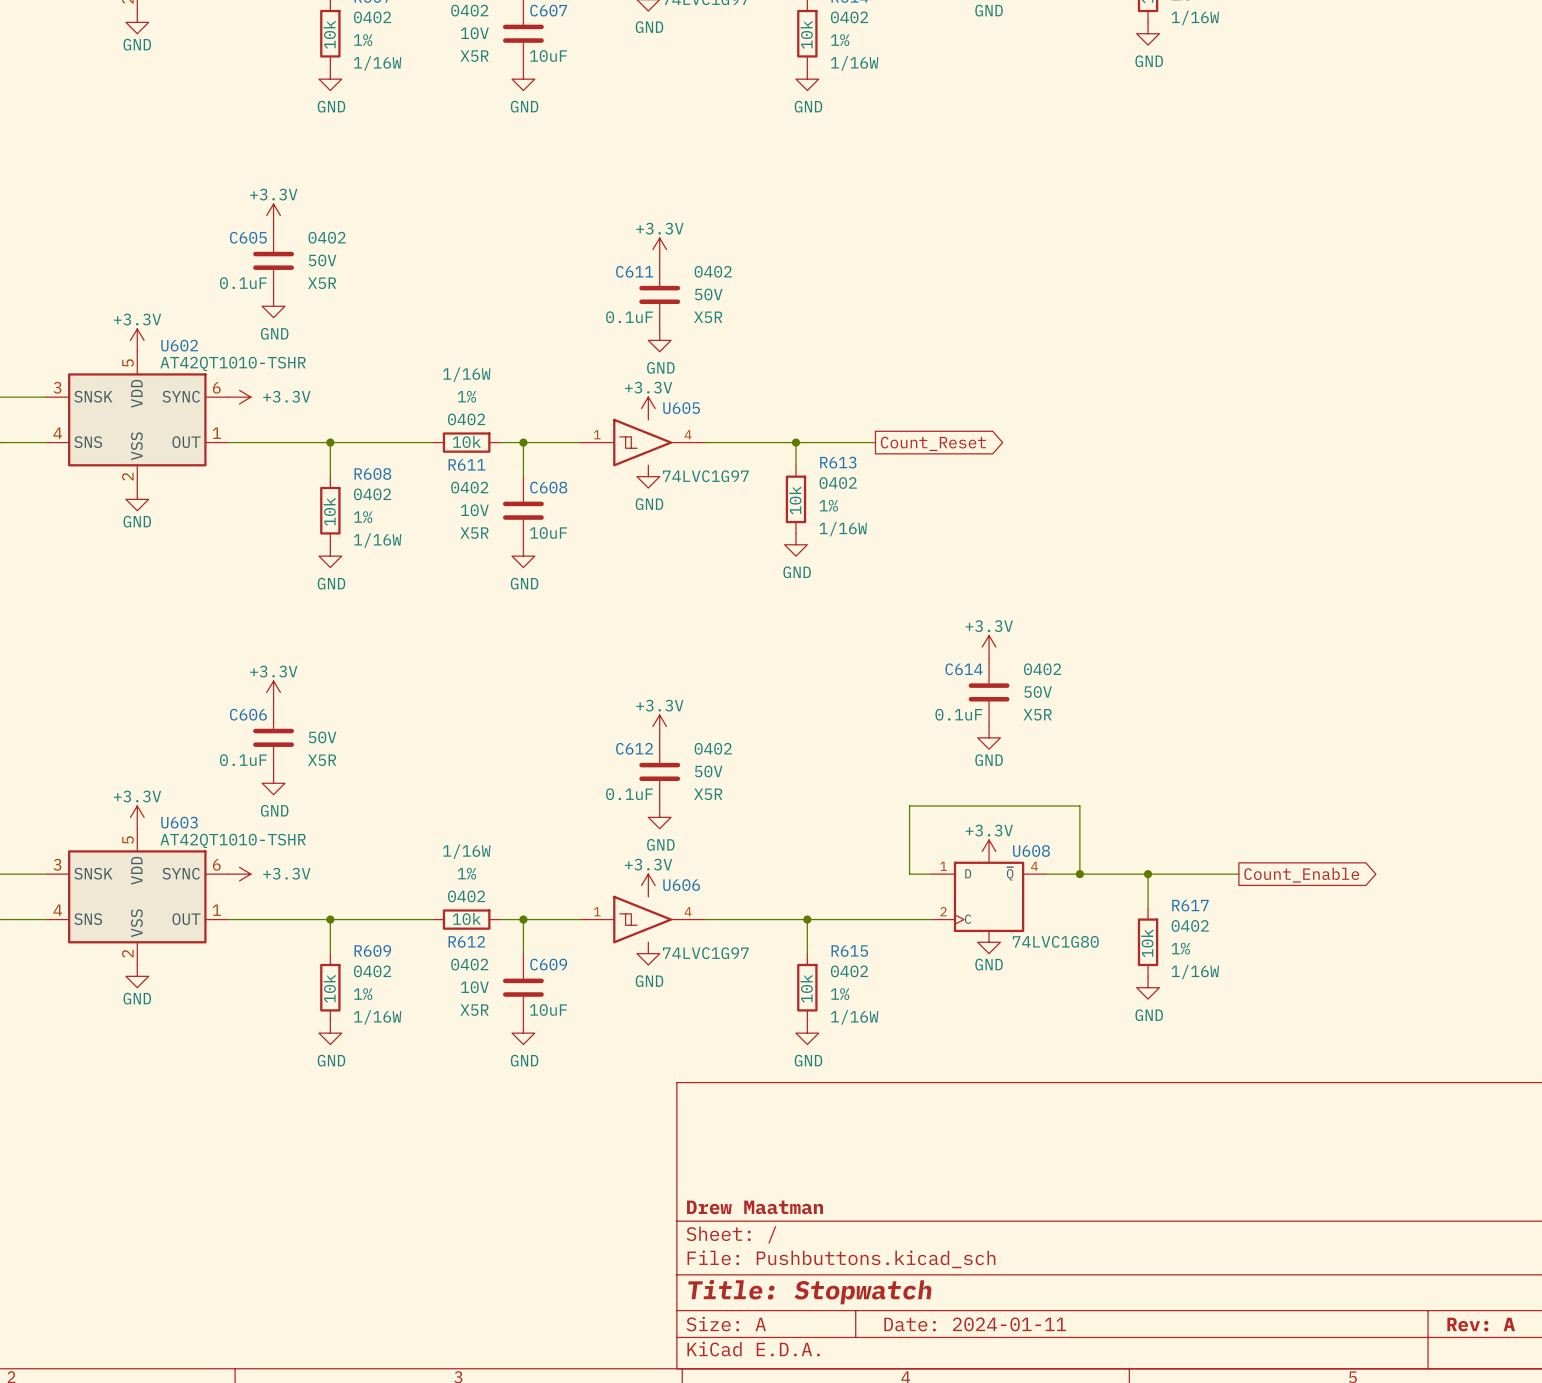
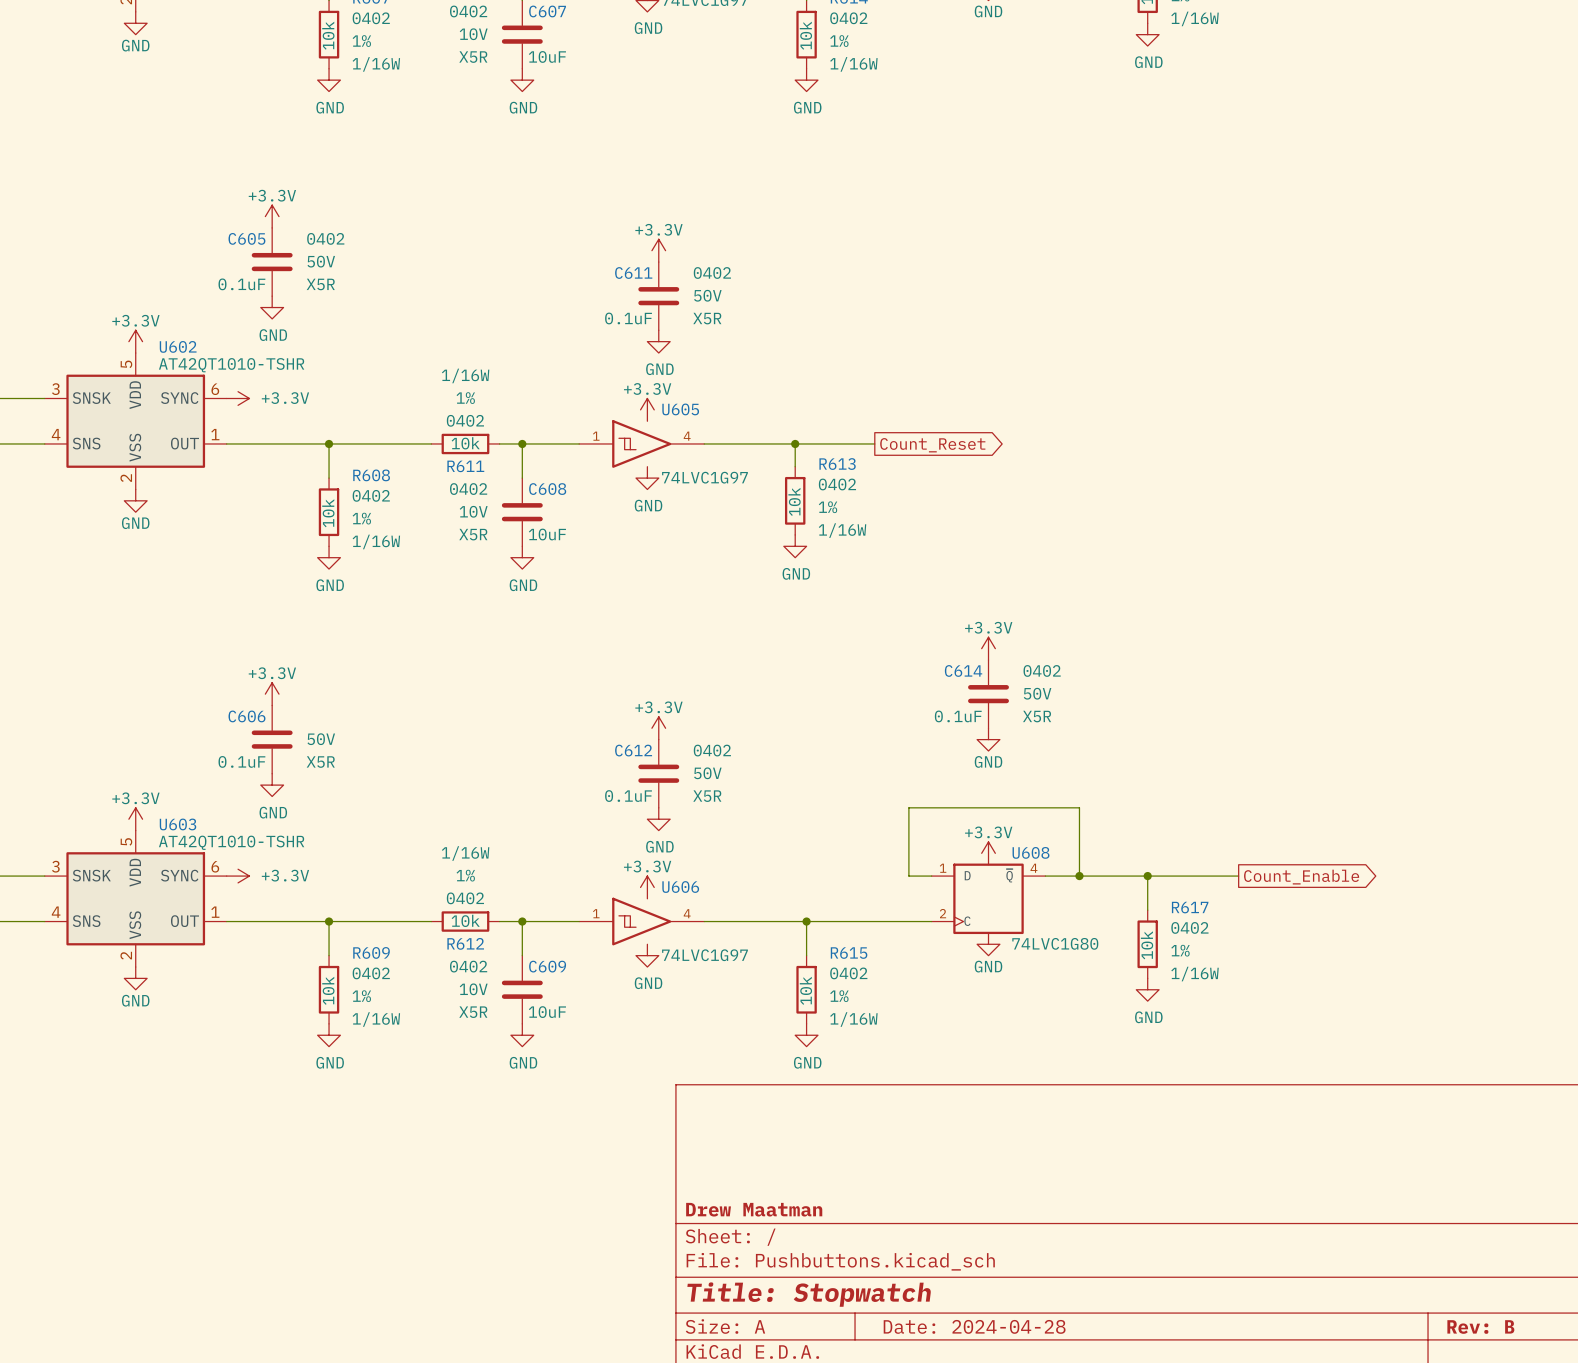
title block: Date: 2024-01-11 (975, 1324) -> Date: 2024-04-28 (974, 1326)
title block: Rev: A (1481, 1324) -> Rev: B (1480, 1327)

